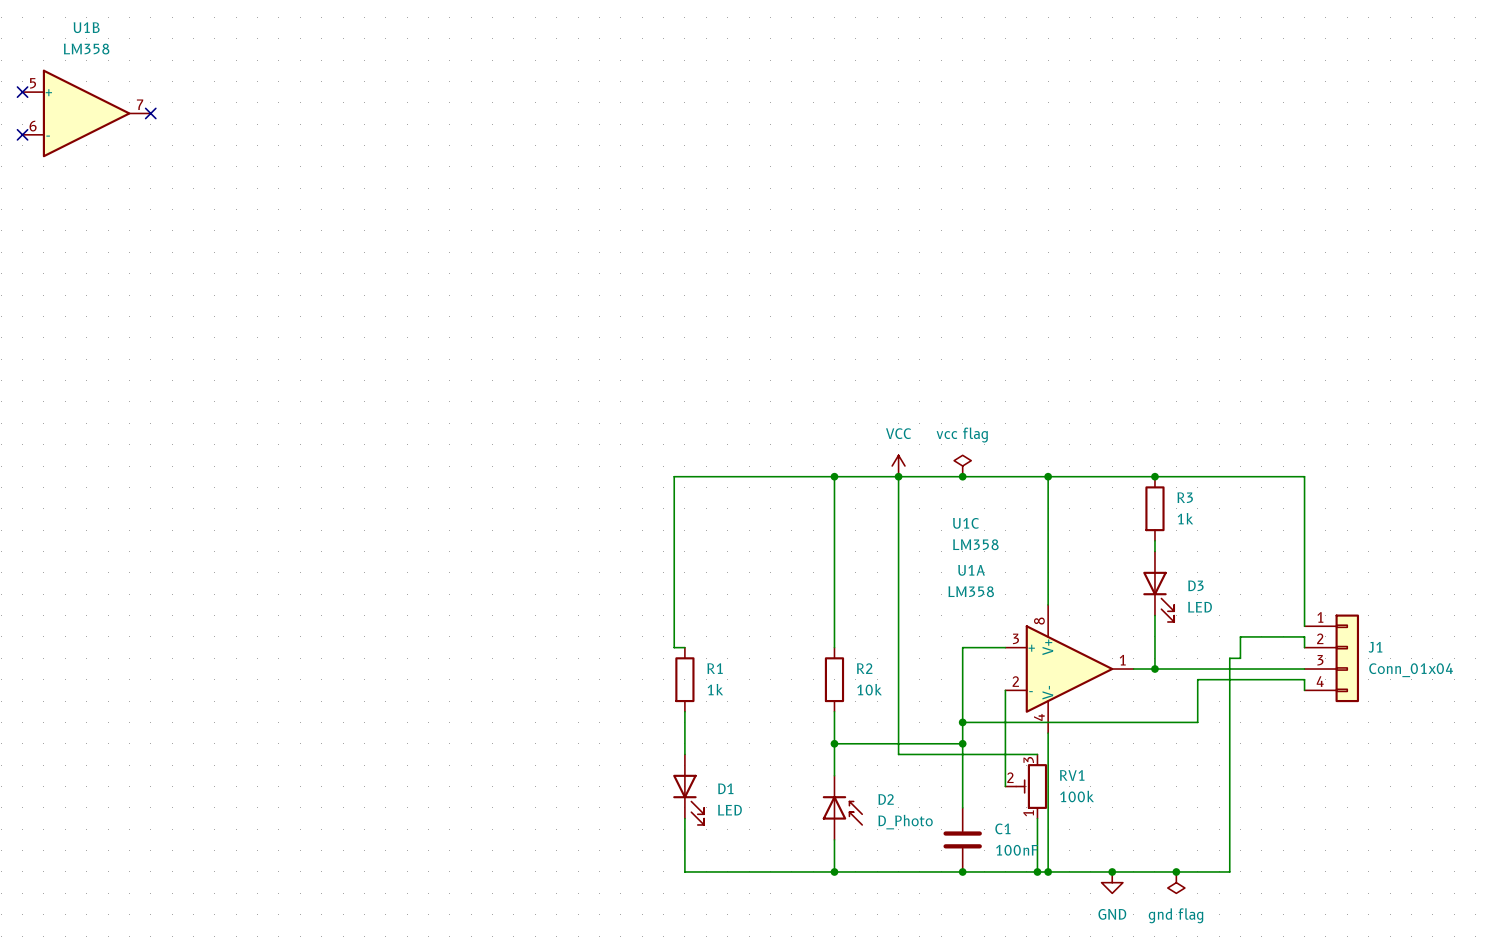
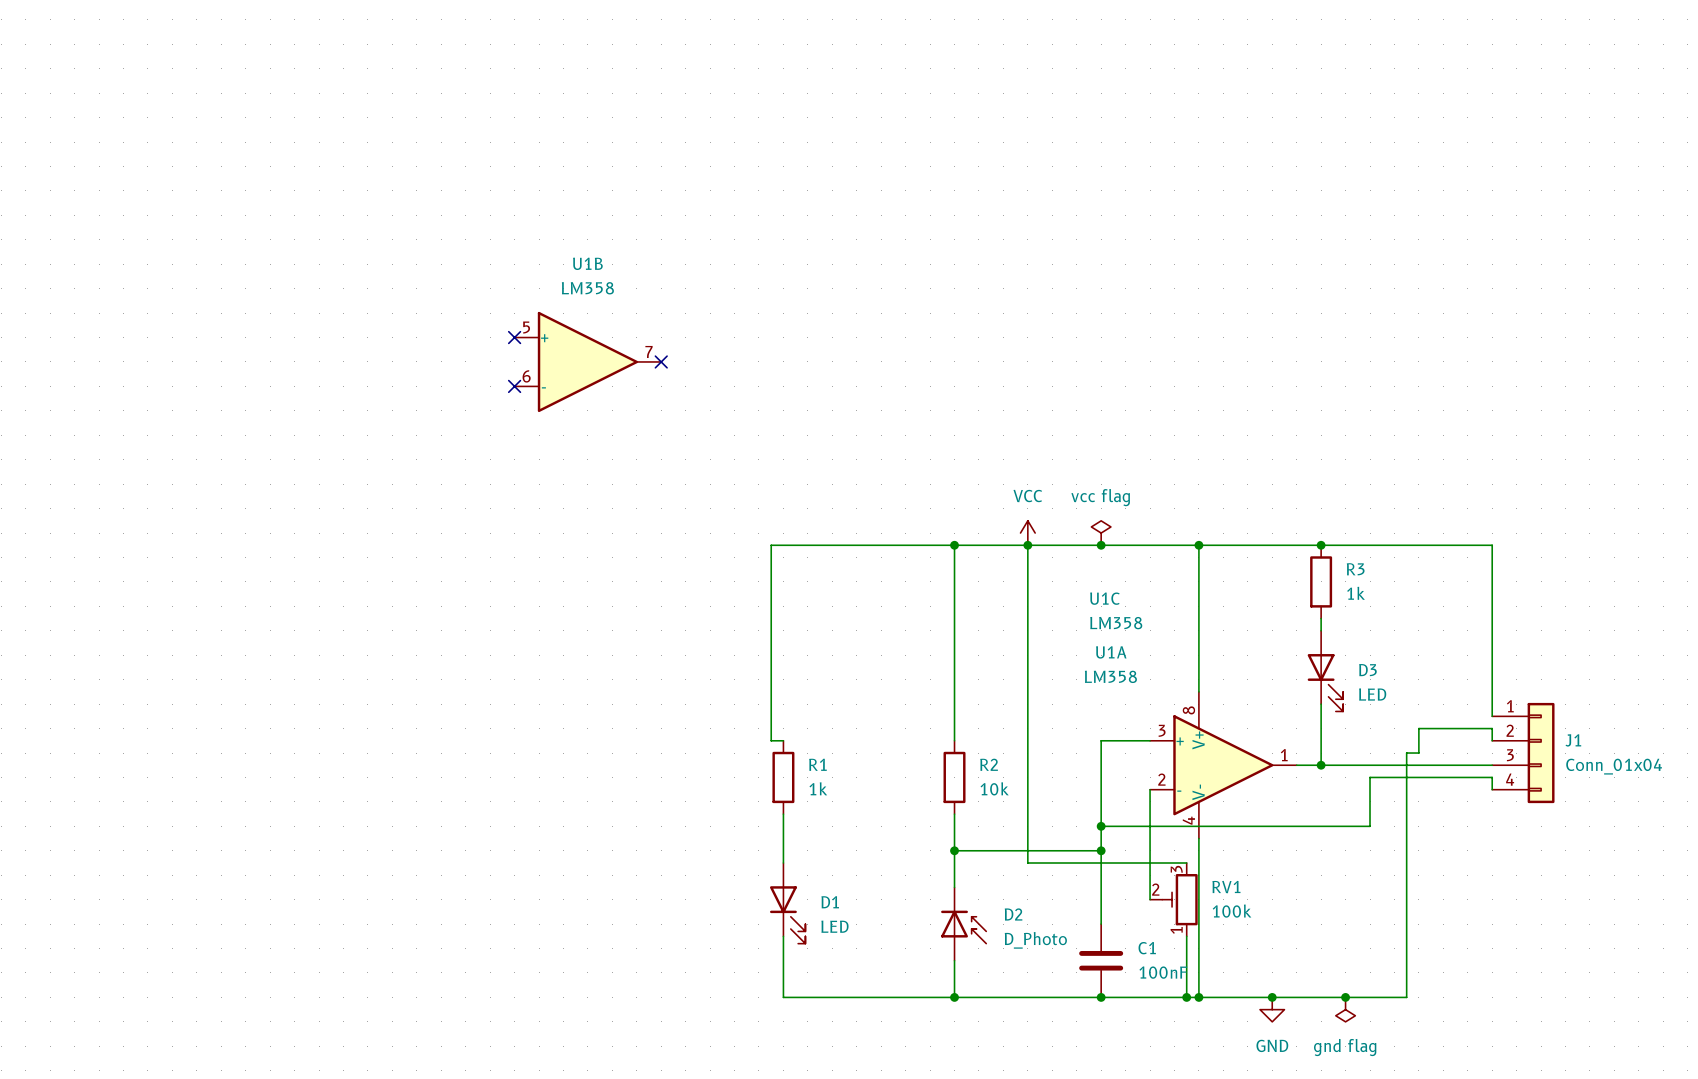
no-connect mark: (22, 92) -> none
U1B position: (86, 113) -> (587, 361)
no-connect mark: (150, 113) -> none
no-connect mark: (22, 134) -> none
no-connect mark: none -> (514, 337)
no-connect mark: none -> (661, 361)
no-connect mark: none -> (514, 386)

